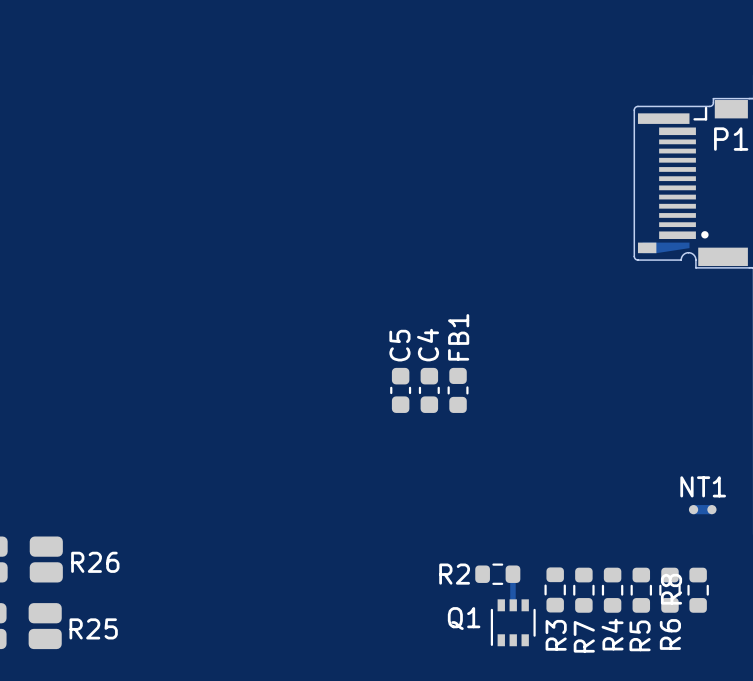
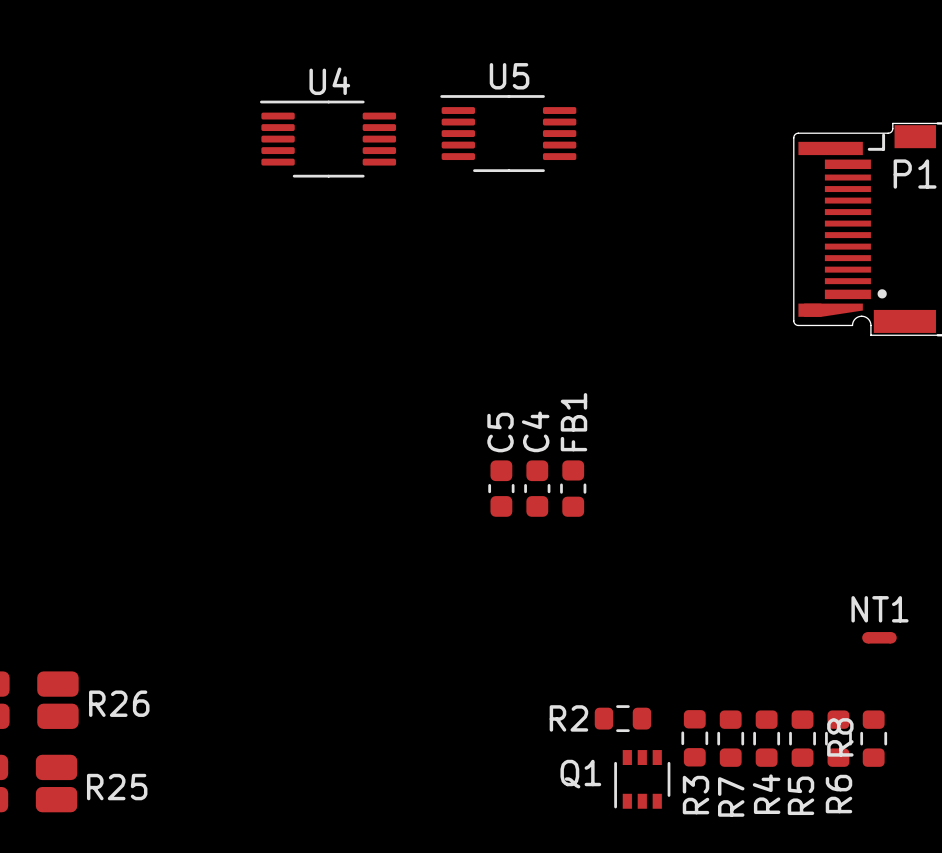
U5: none -> (508, 133)
U4: none -> (328, 139)
track: (512, 574) (513, 605) -> none

